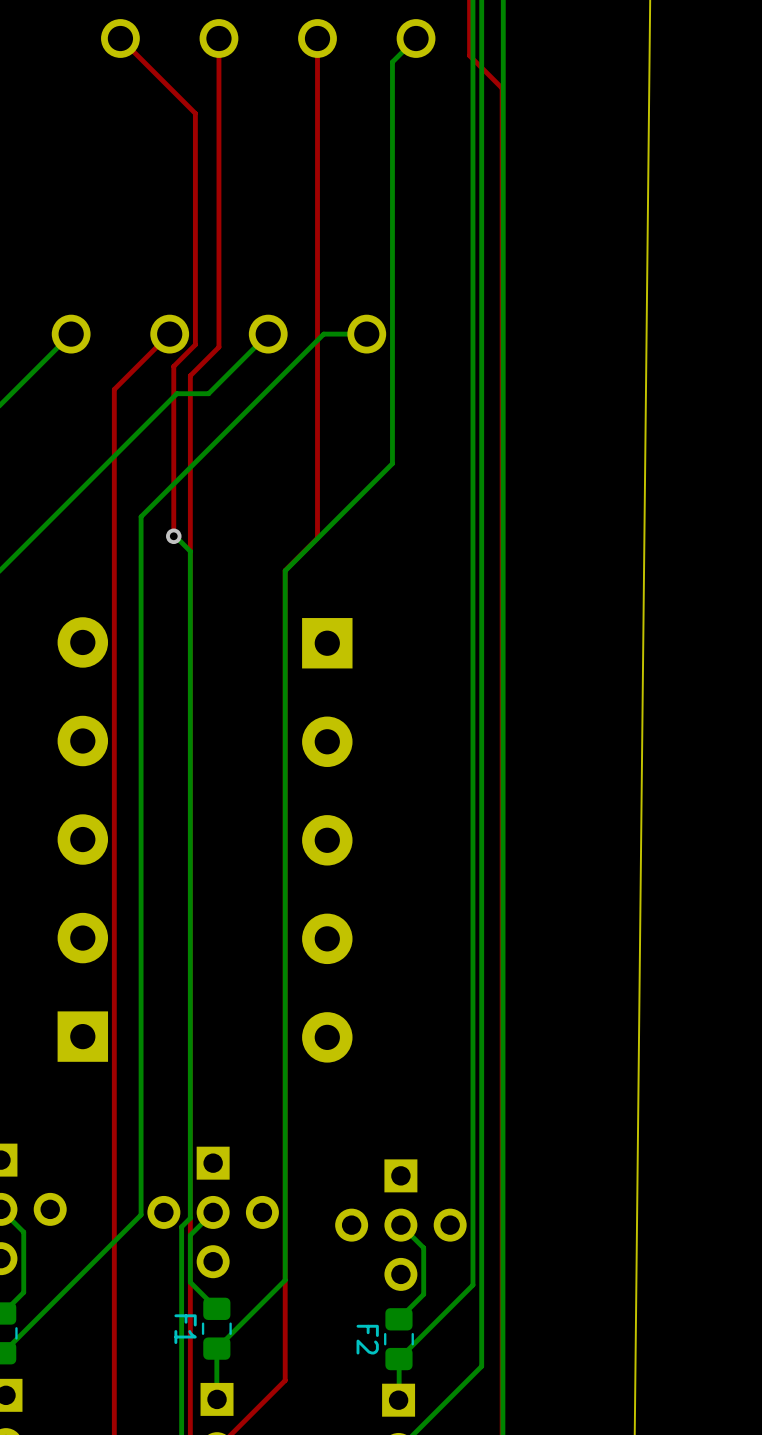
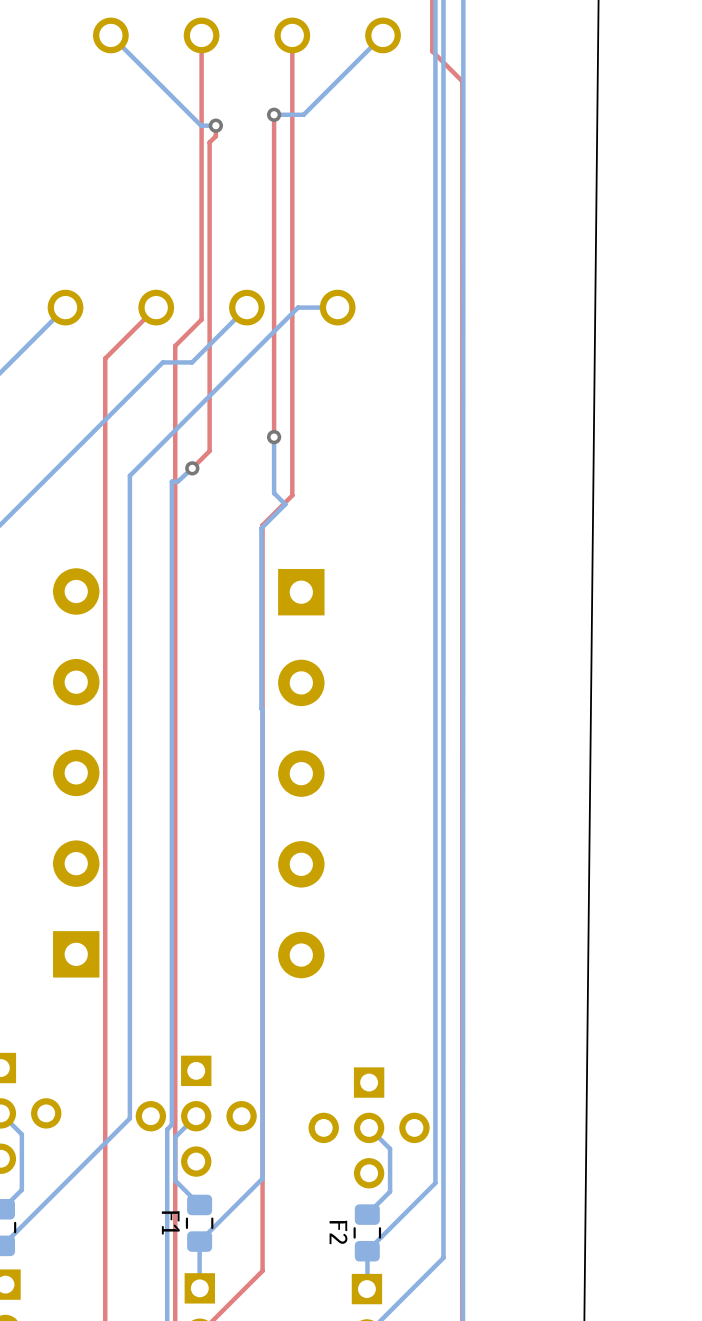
bottom track: none -> (110, 35) (201, 125) (215, 125)
top track: (120, 38) (195, 113) (195, 344) (173, 366) (173, 536) -> none
bottom track: (392, 62) (392, 463) (285, 570) (285, 771) -> (274, 437) (274, 493) (285, 504) (261, 528) (262, 709)
bottom track: none -> (361, 57) (303, 114) (274, 114)
via: none -> (274, 114)
top track: none -> (275, 114) (274, 437)
top track: none -> (215, 125) (215, 136) (209, 142) (209, 451) (192, 468)
via: none -> (215, 125)
via: none -> (274, 437)
via position: (173, 536) -> (192, 468)
bottom track: (175, 536) (173, 534) (190, 551) (190, 1218) (186, 1221) -> (189, 469) (192, 468) (177, 481) (171, 481) (171, 1124)

